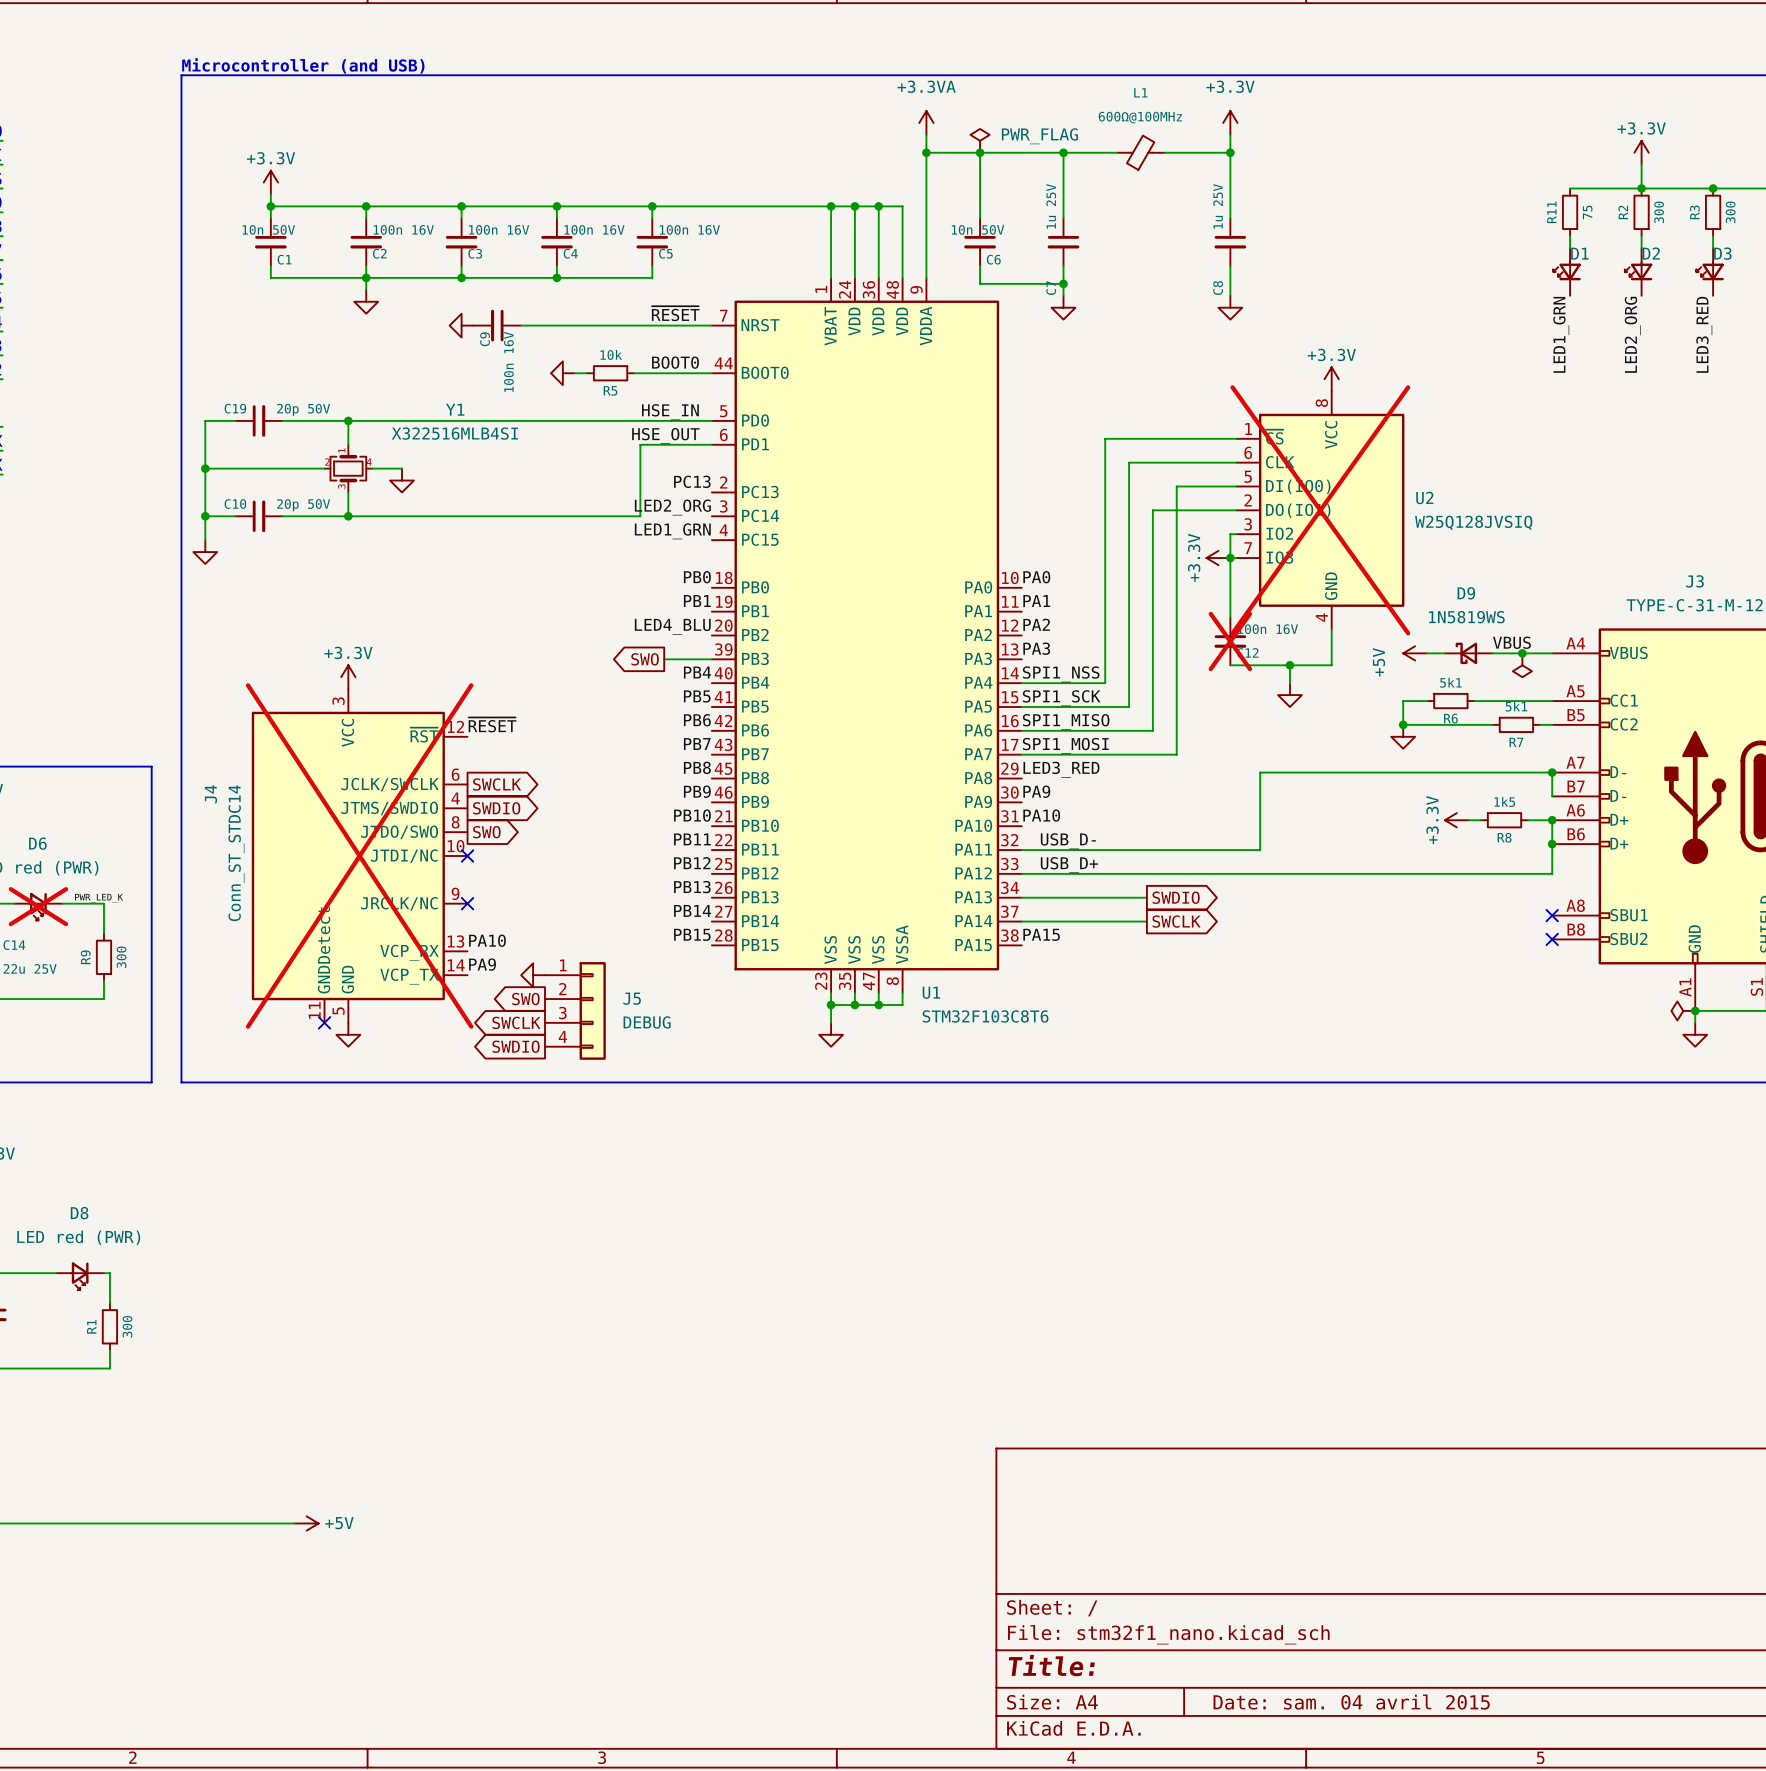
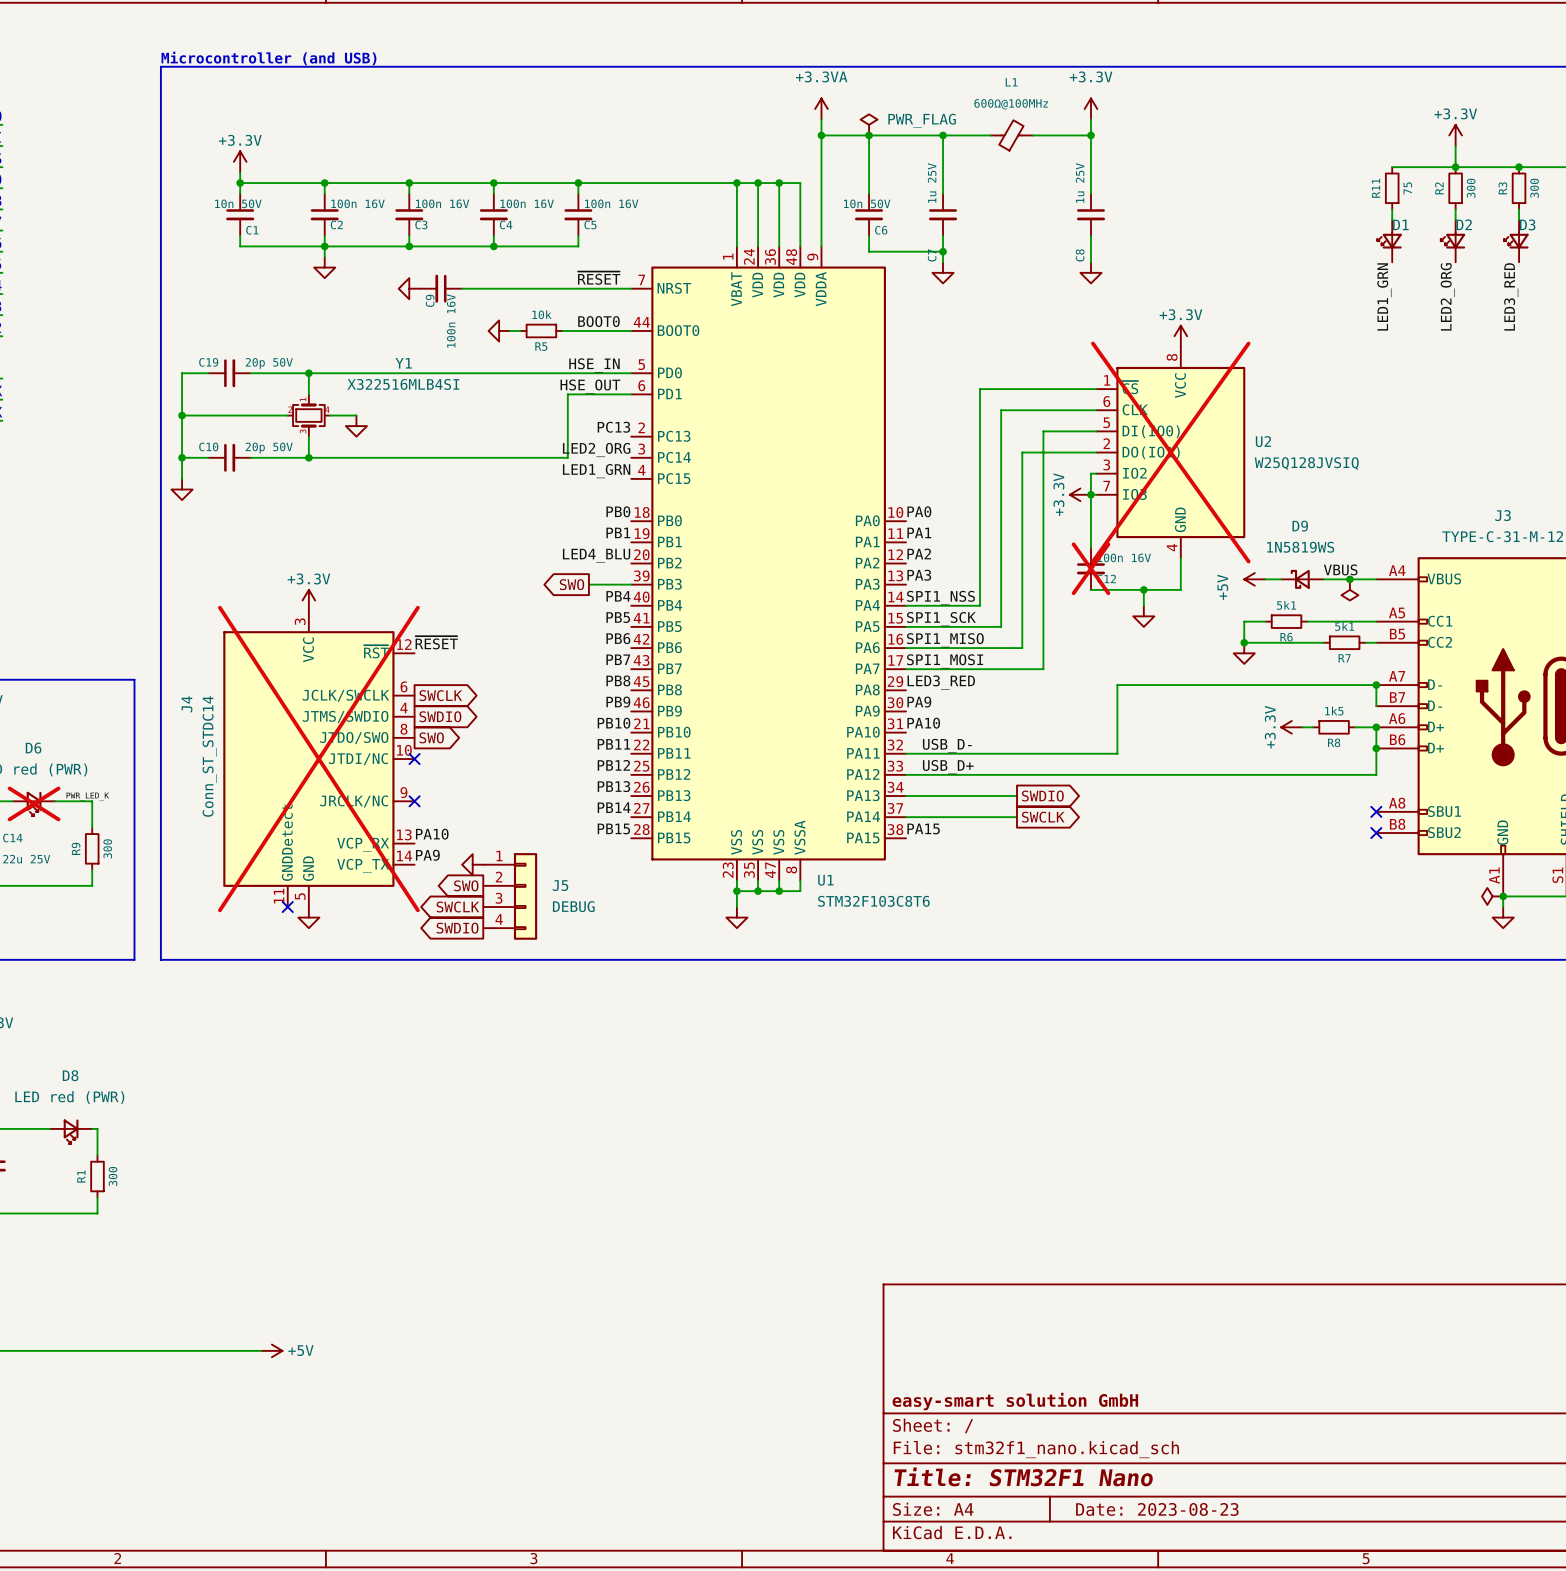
title block: none -> easy-smart solution GmbH (1015, 1401)
title block: Title: (1051, 1665) -> Title: STM32F1 Nano (1023, 1476)
title block: Date: sam. 04 avril 2015 (1351, 1702) -> Date: 2023-08-23 (1157, 1509)

